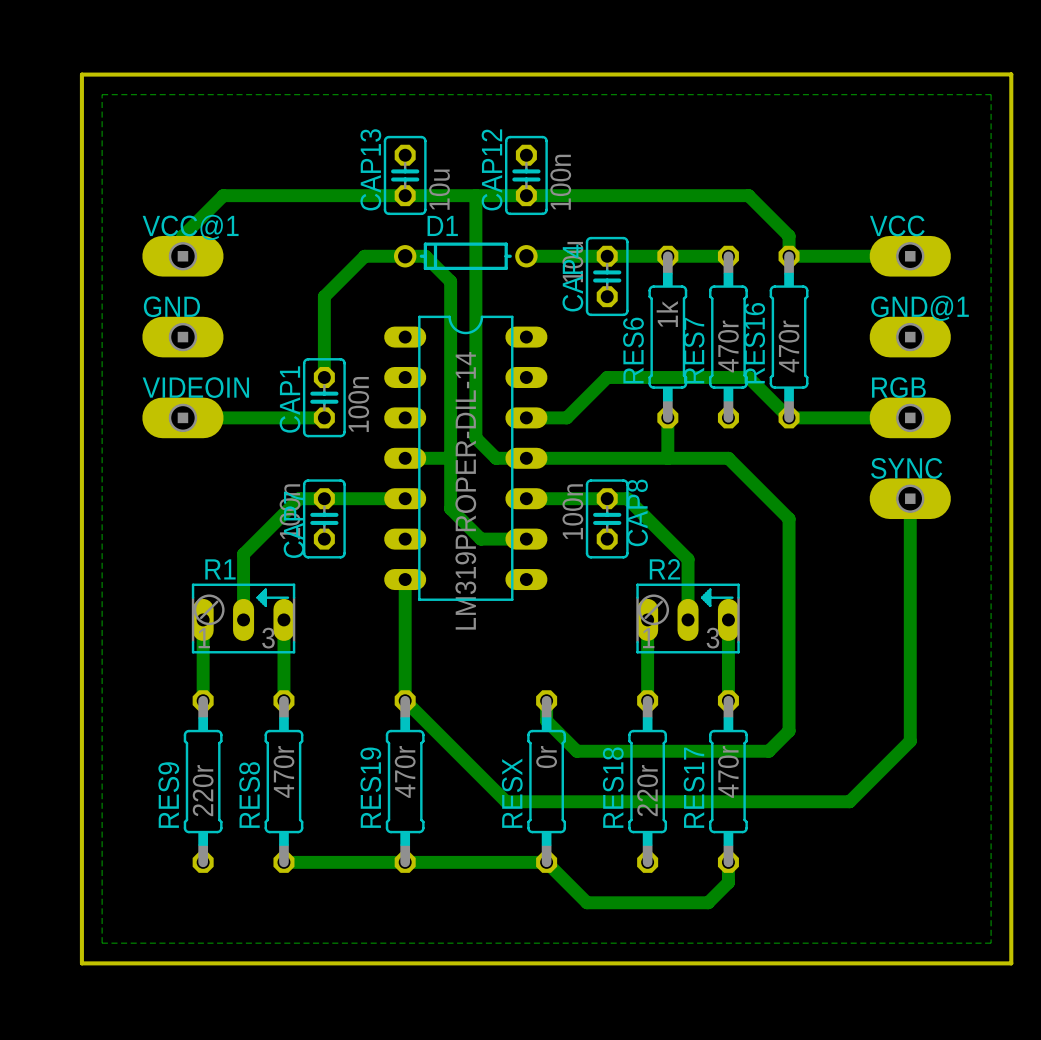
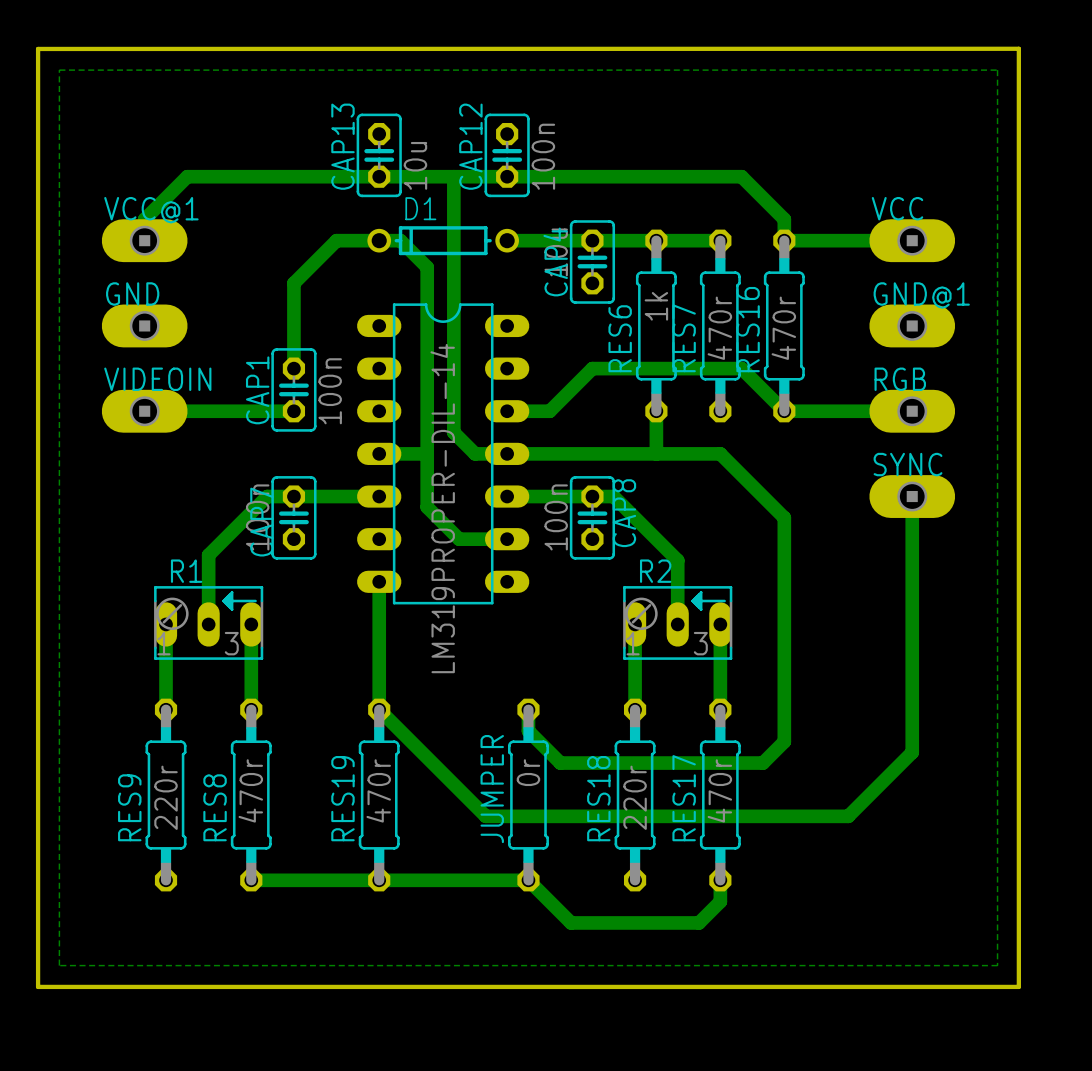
RESX name: RESX (512, 793) -> JUMPER (492, 789)

